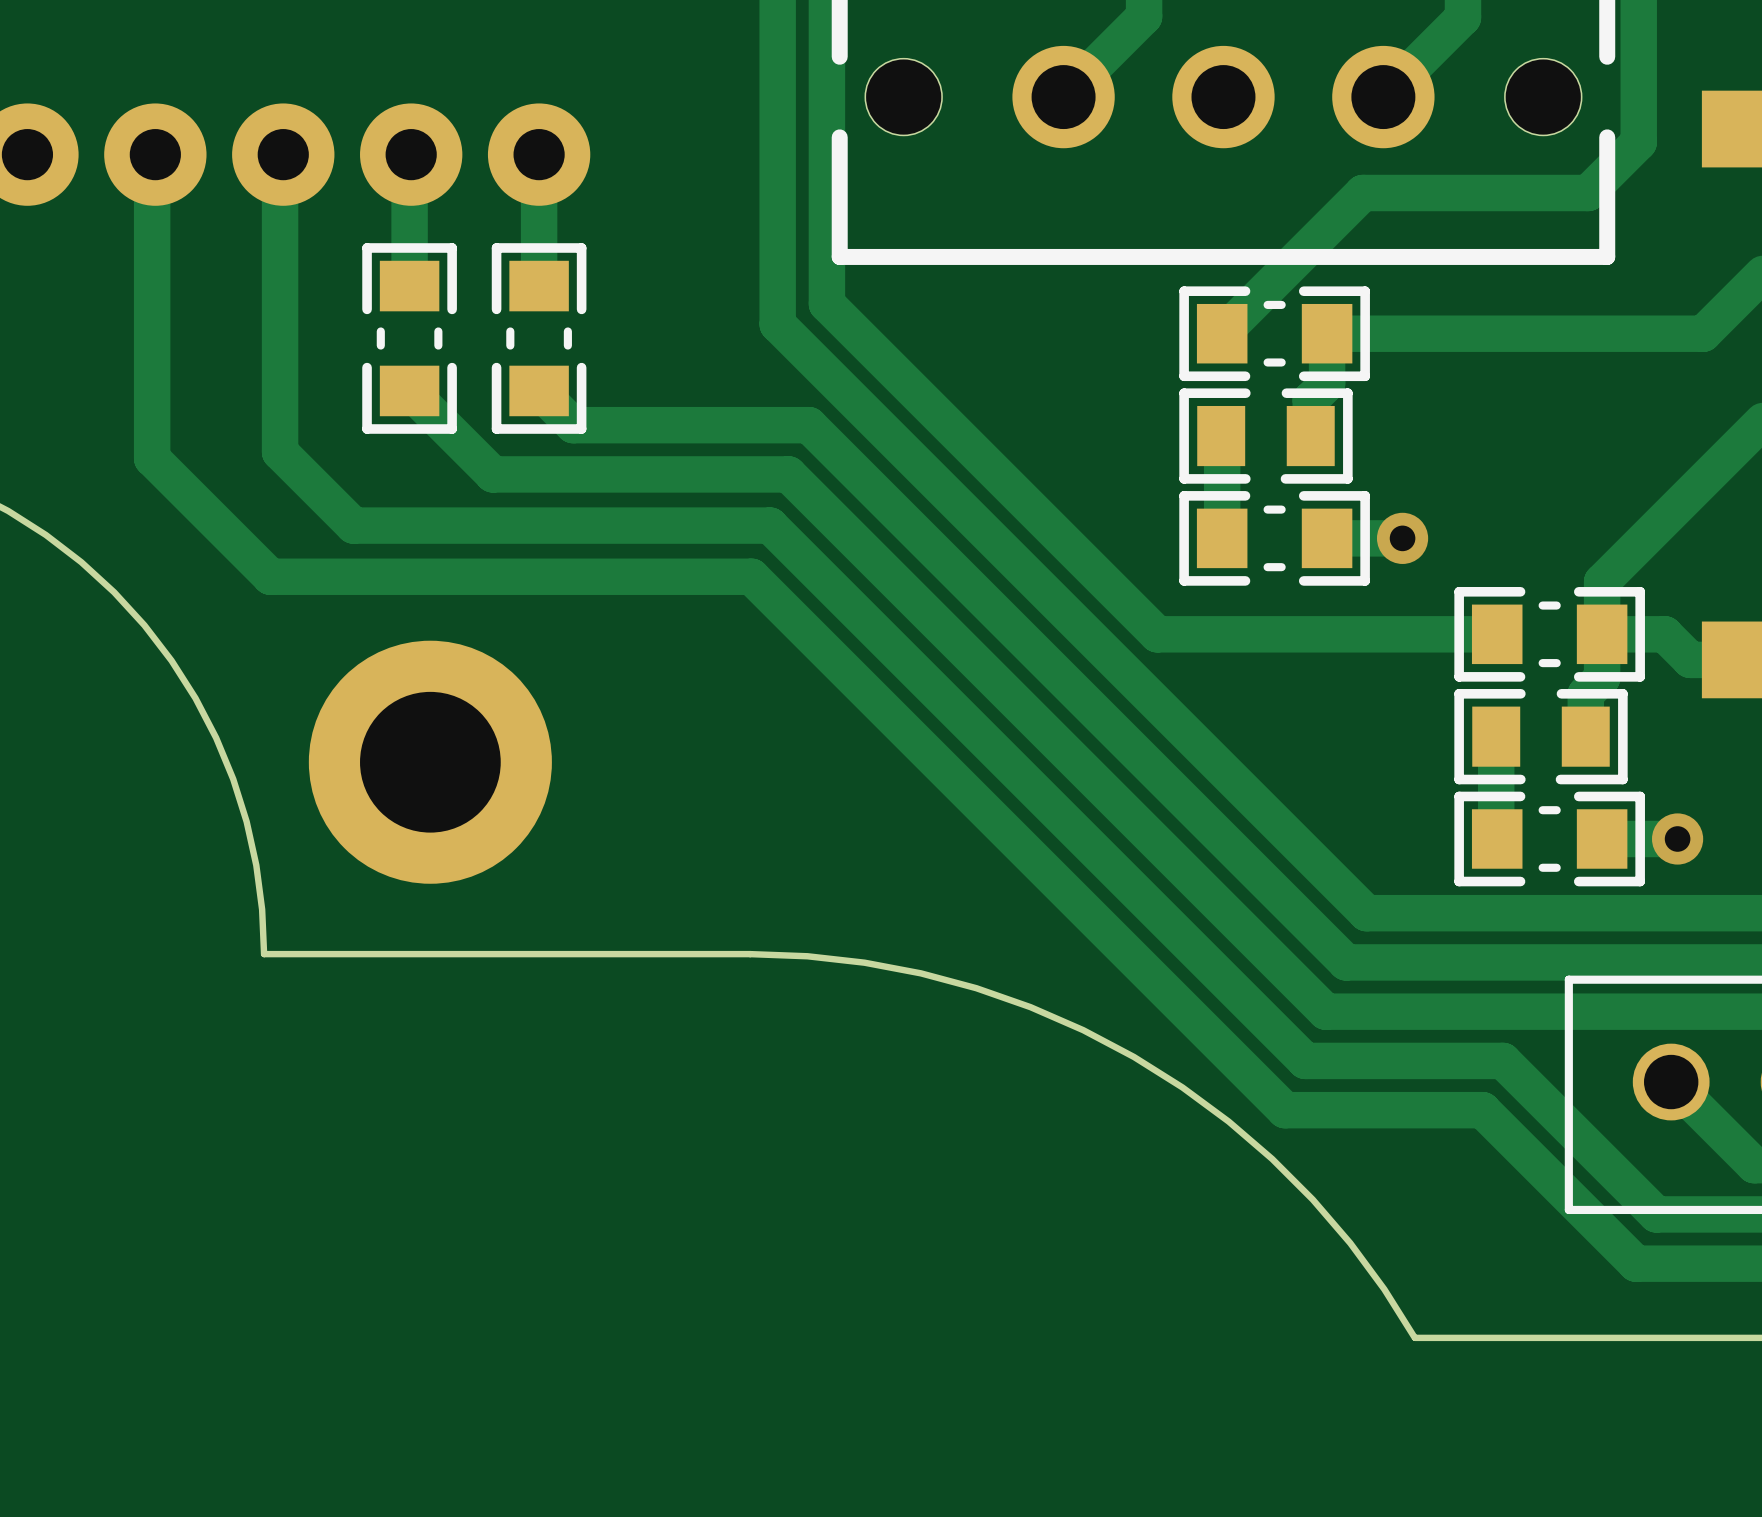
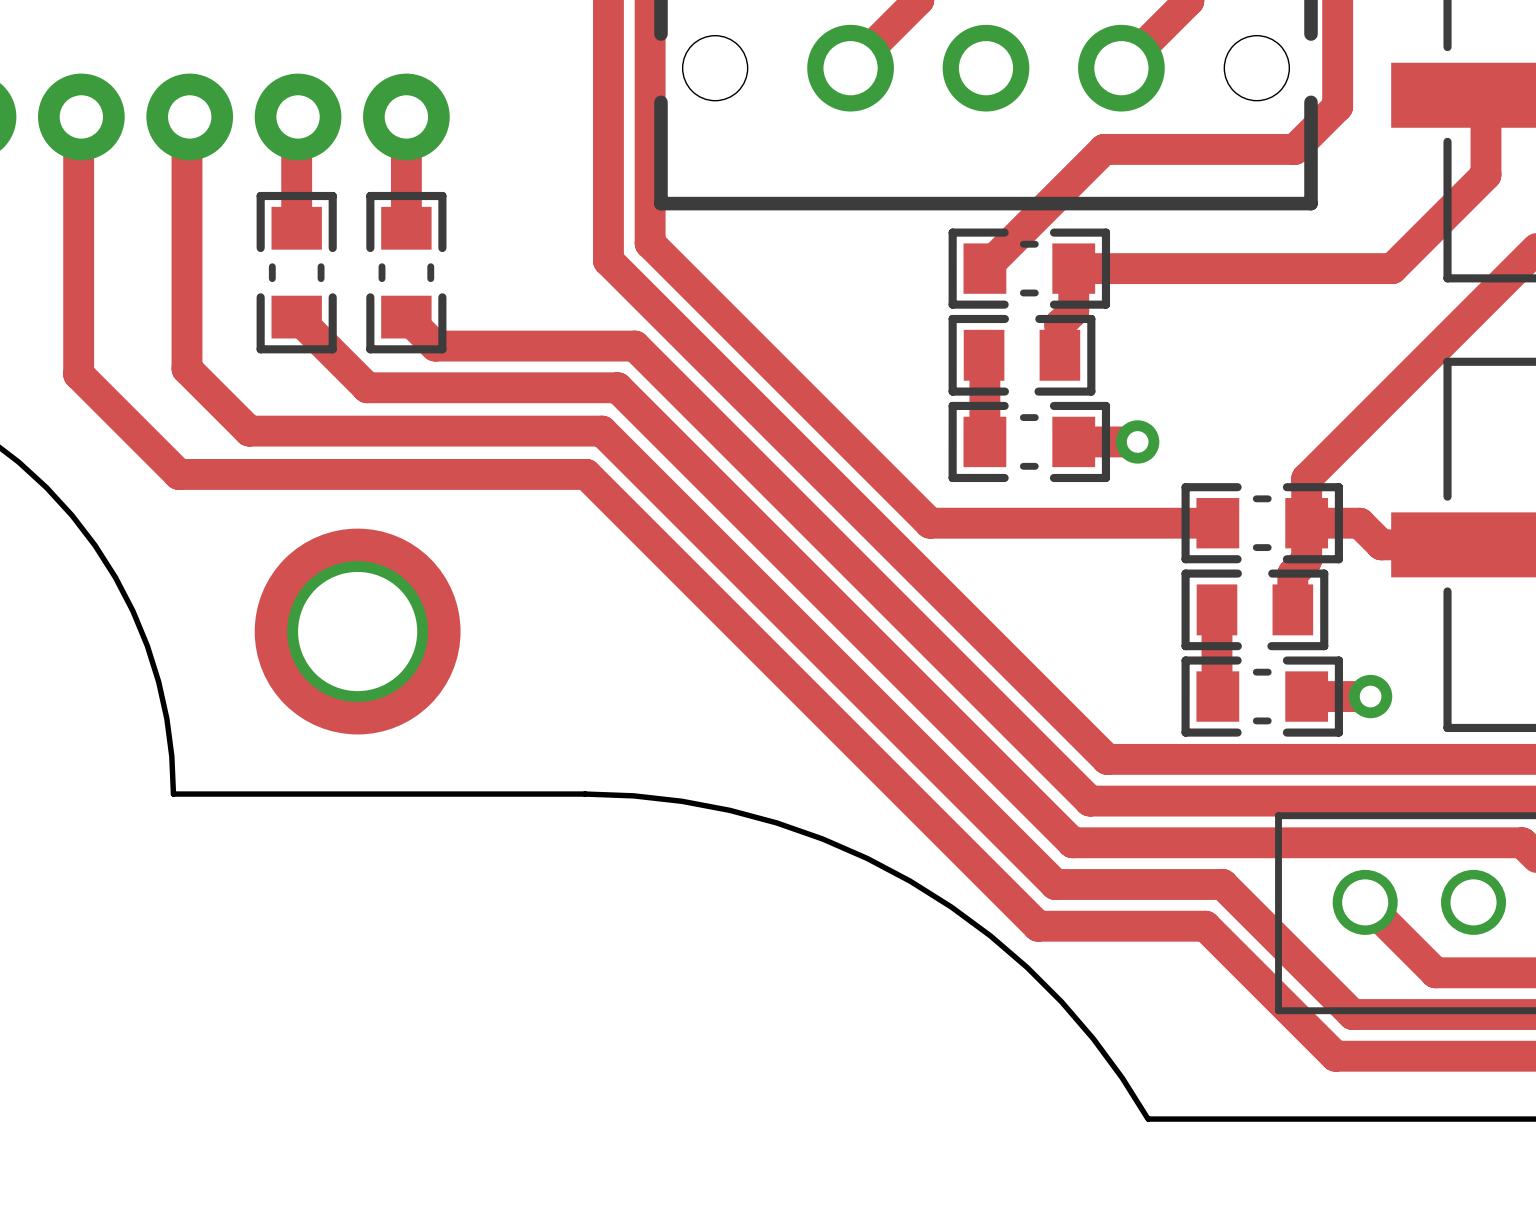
part position: (430, 762) -> (357, 631)

